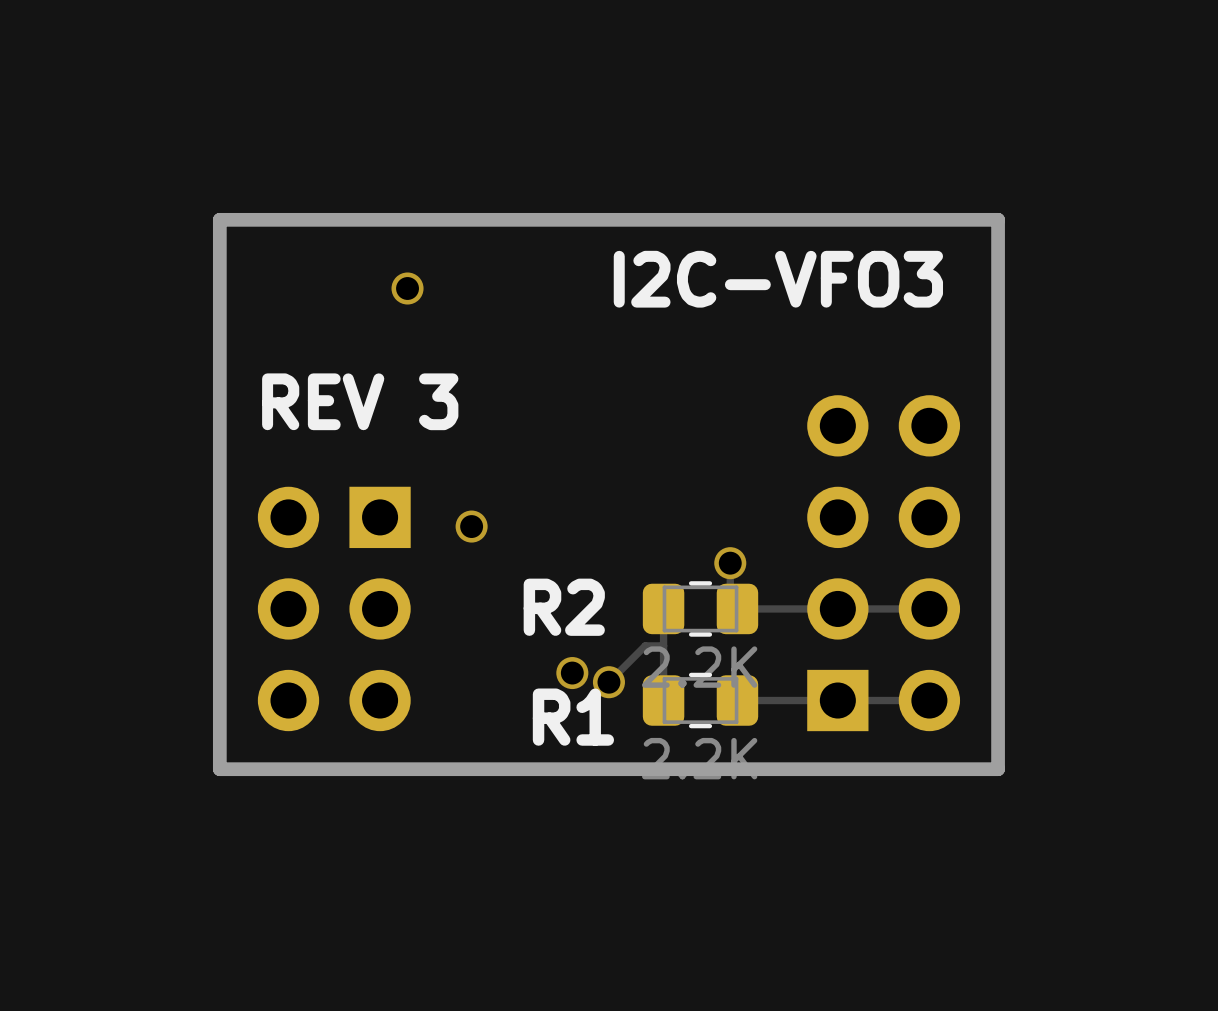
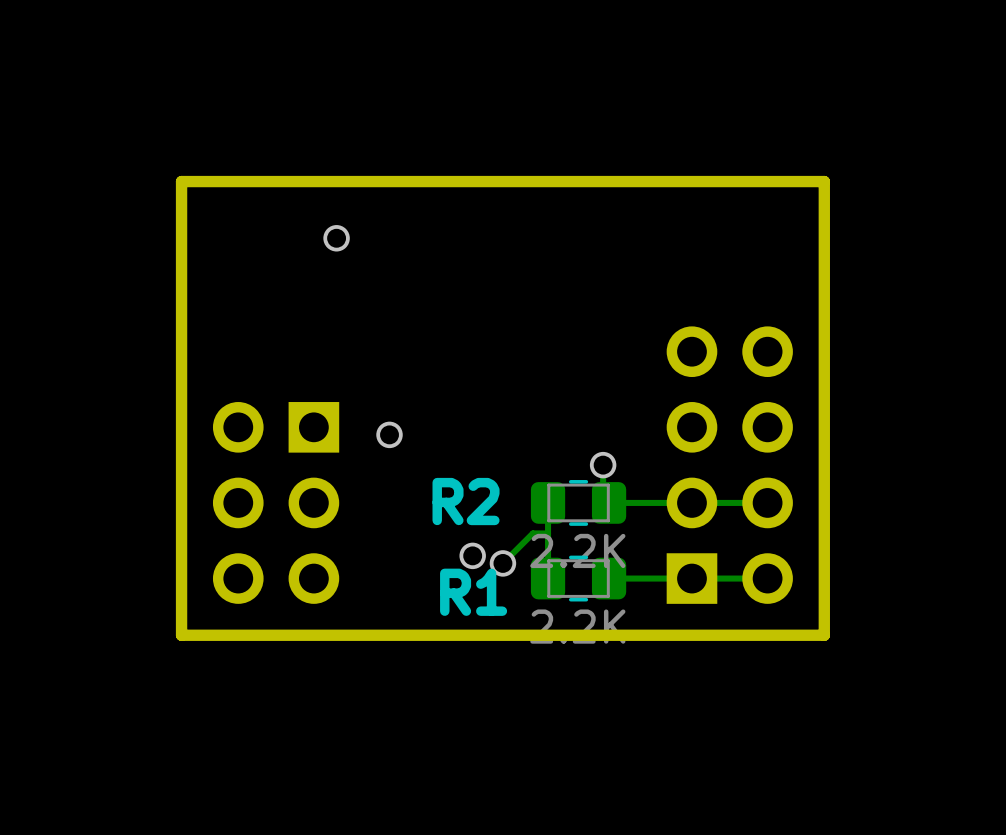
text: I2C-VFO3 (778, 279) -> none
text: REV 3 (360, 401) -> none

